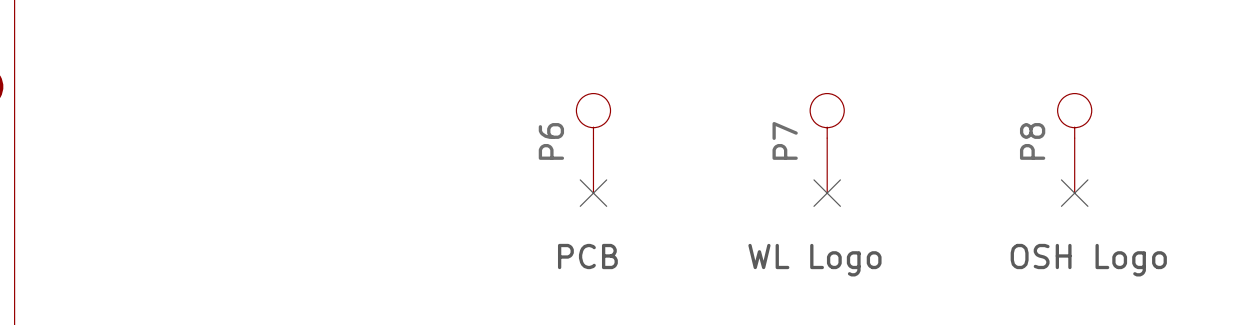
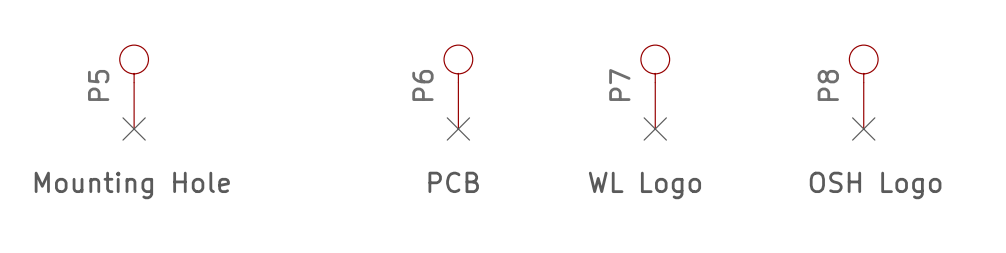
P5: none -> (134, 87)
no-connect mark: none -> (134, 128)
text: none -> Mounting Hole (132, 185)

